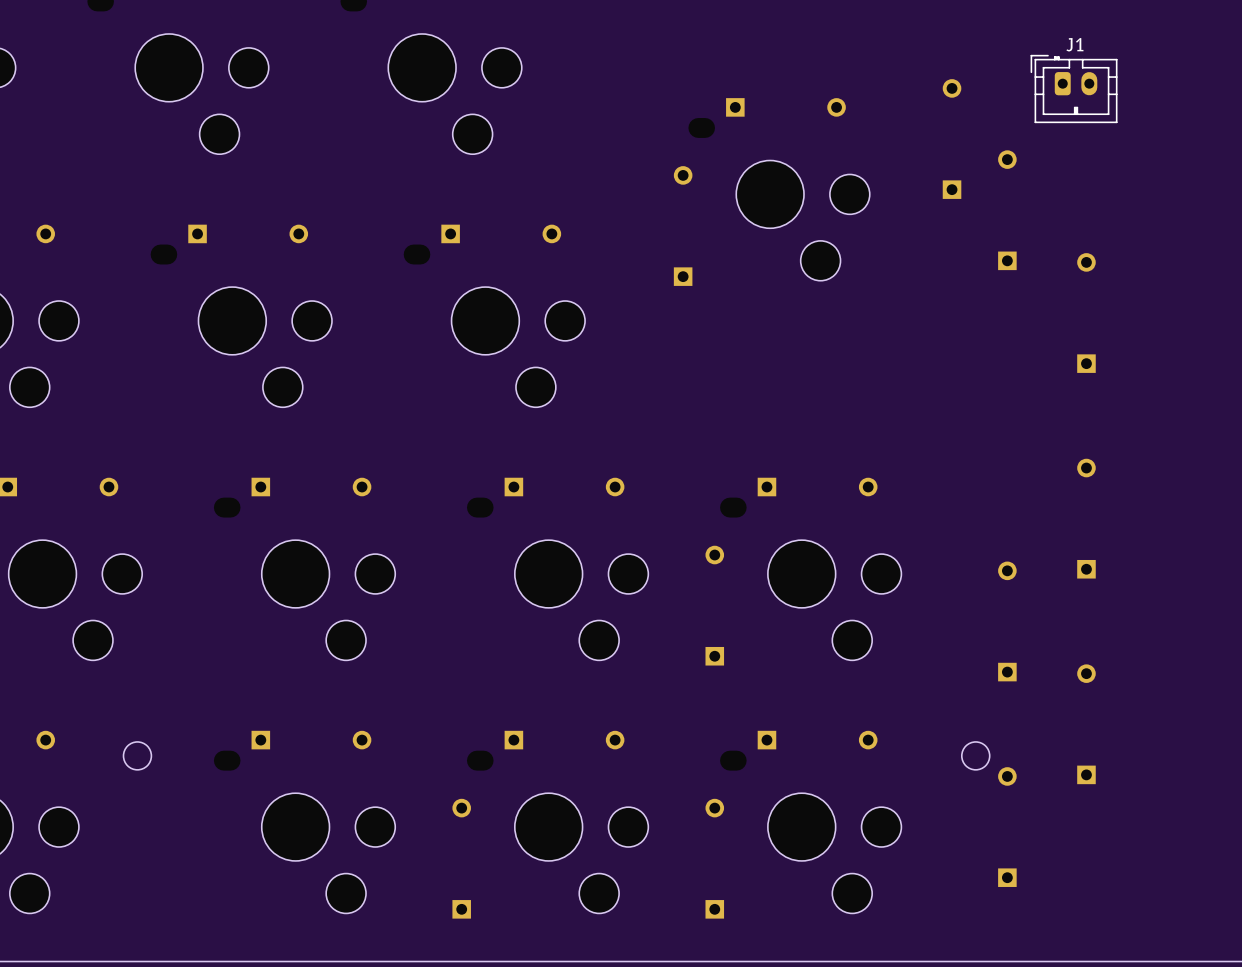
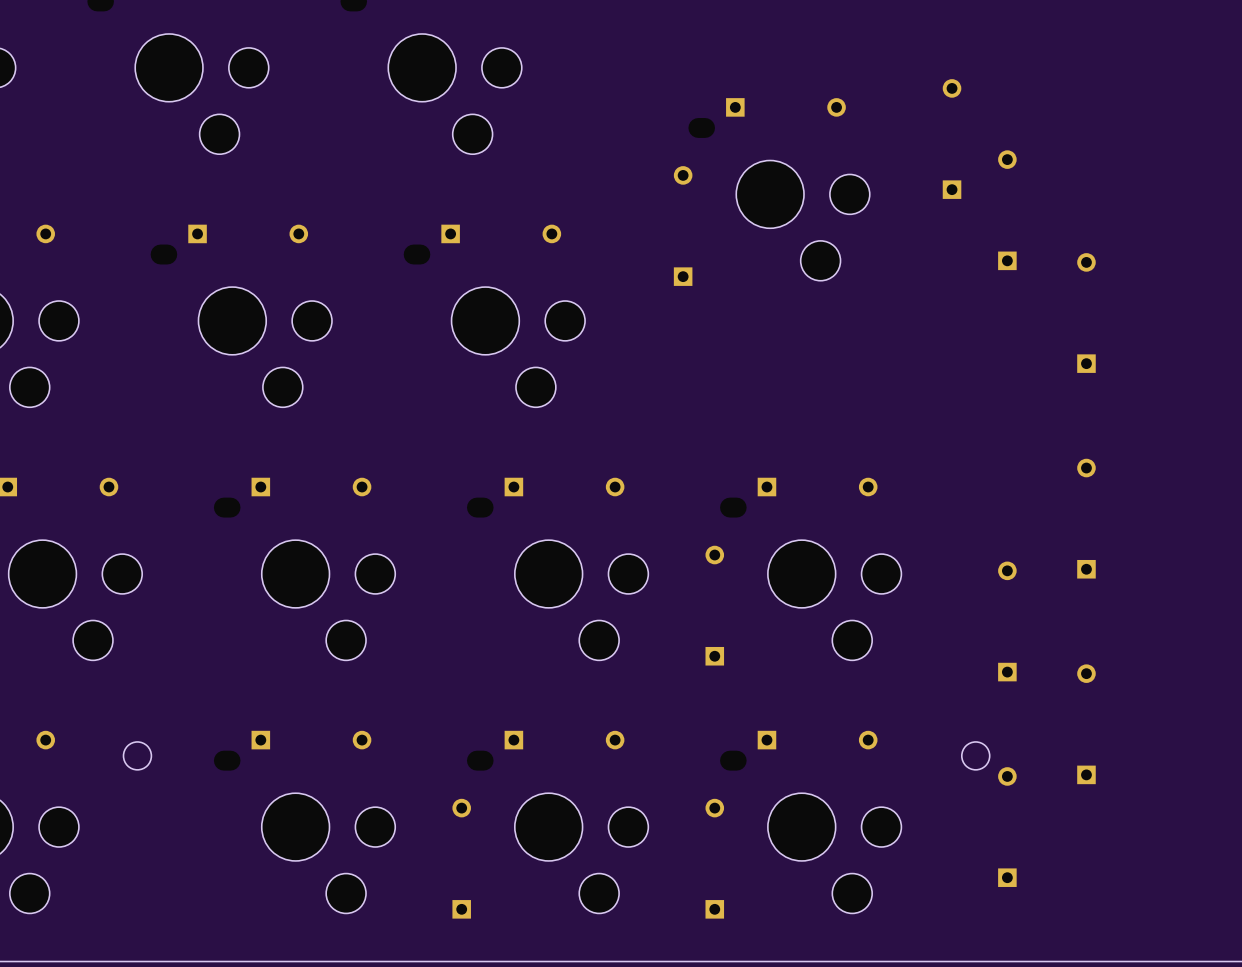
J1: (1074, 88) -> none

